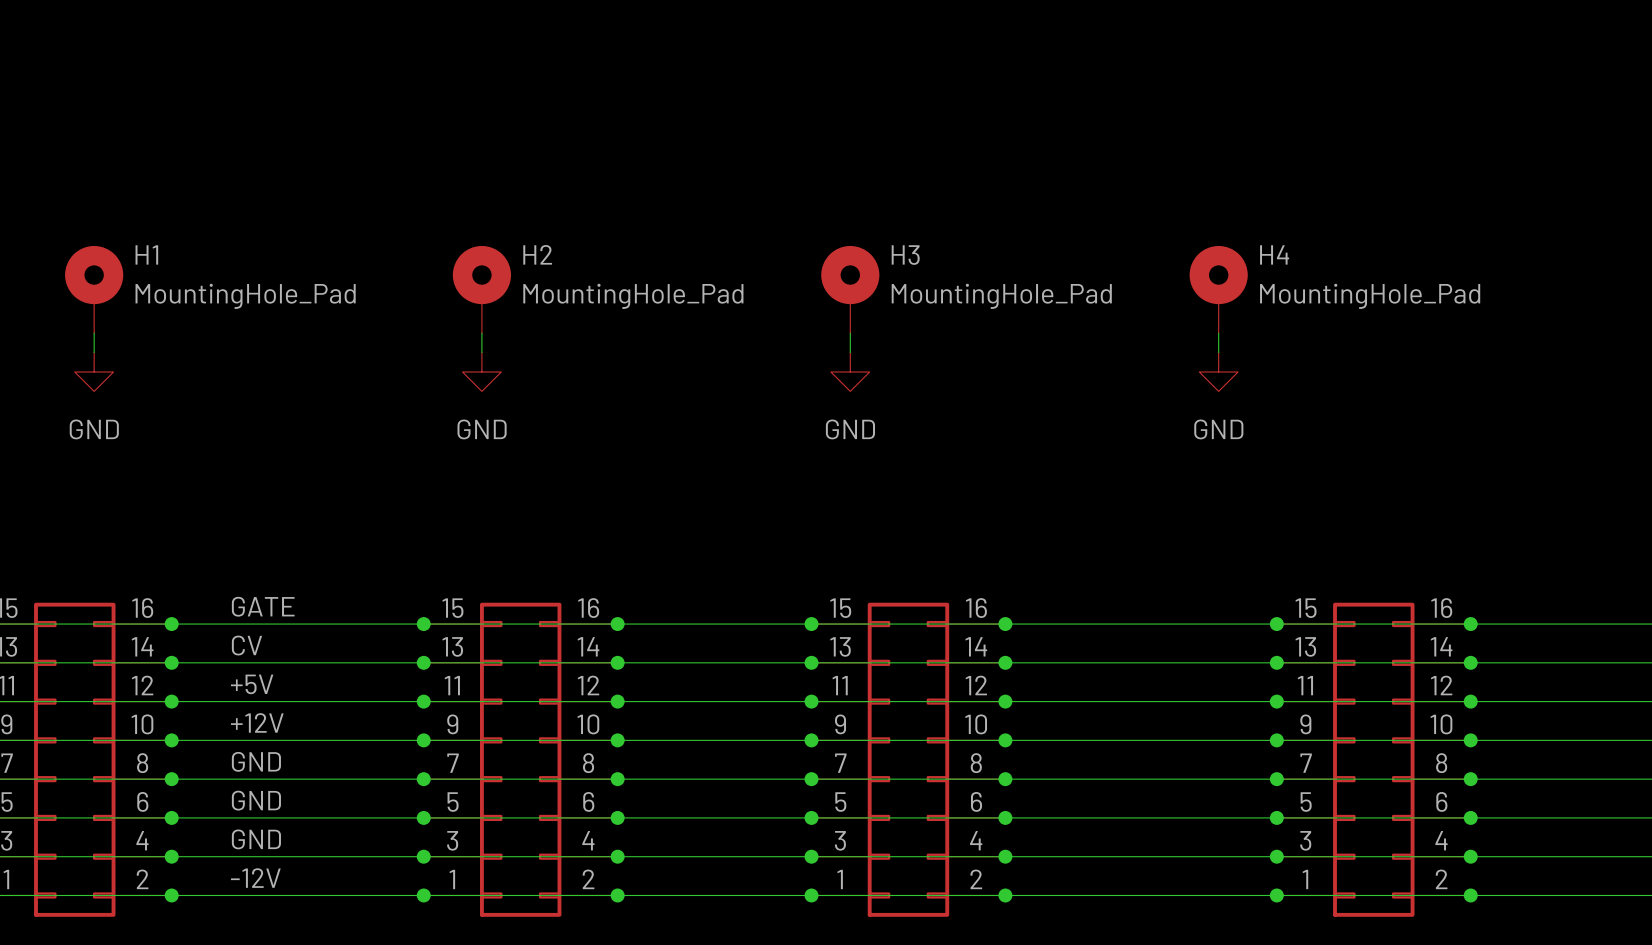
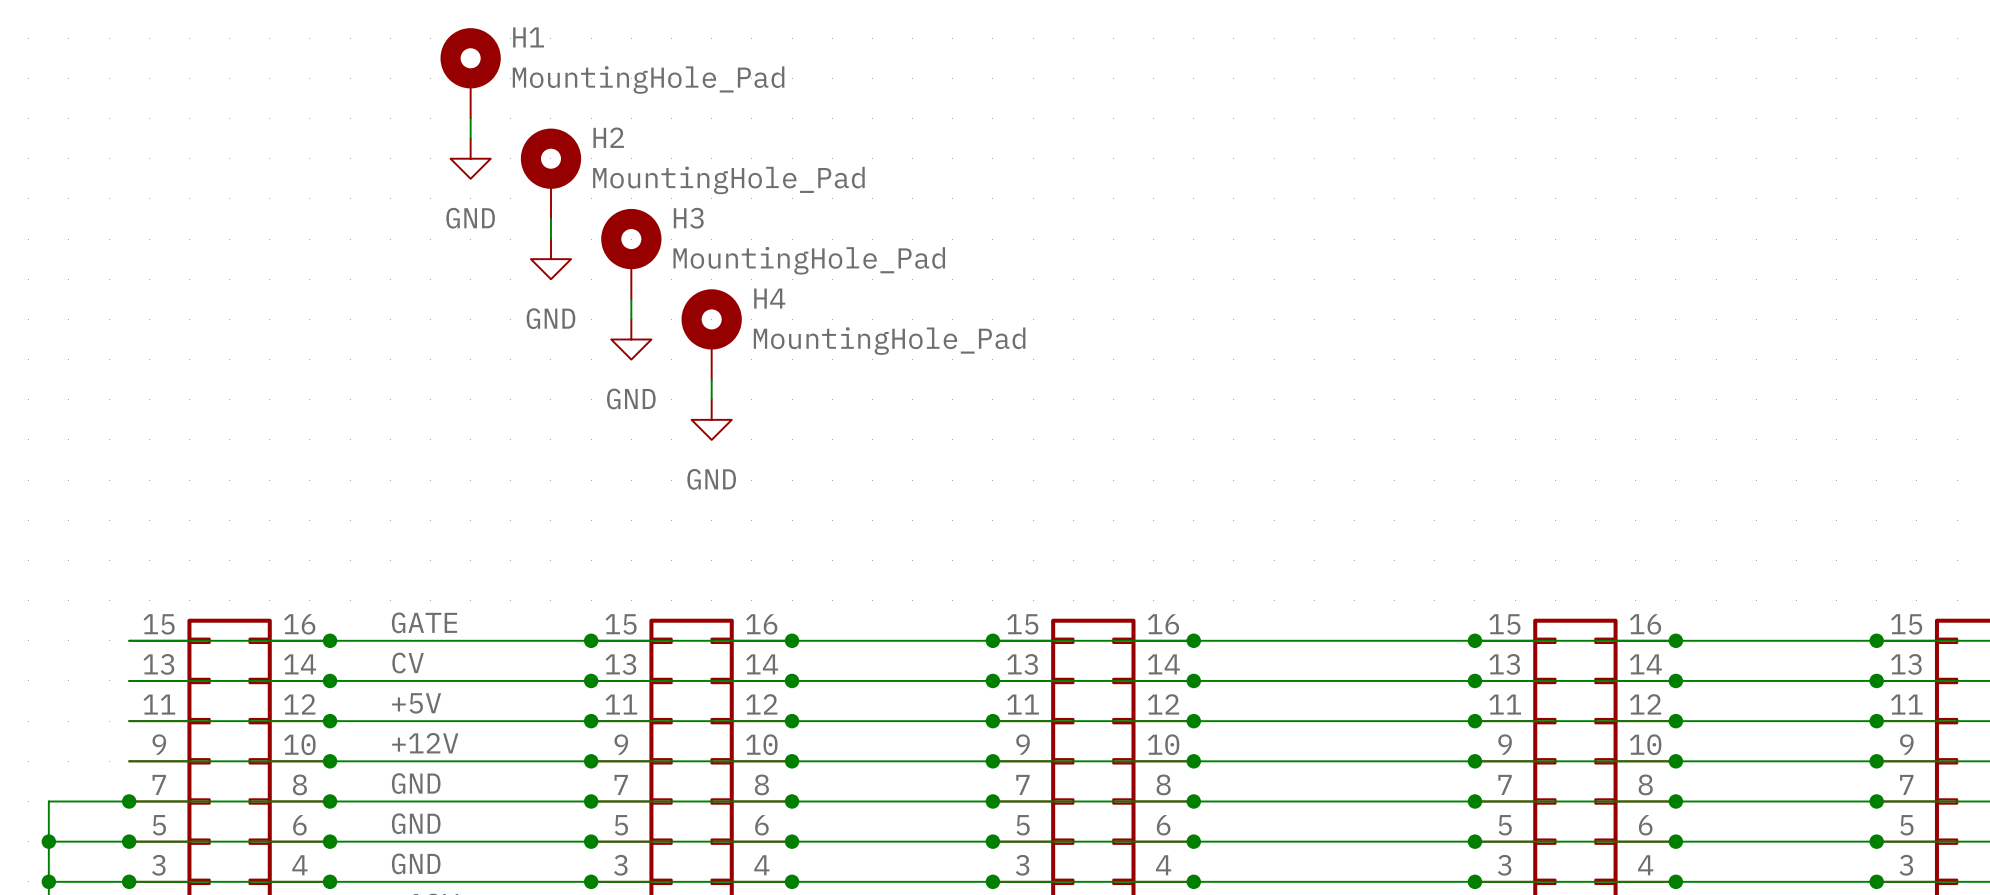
power symbol: none -> GND (470, 158)
wire: none -> (550, 218) (550, 239)
power symbol: none -> GND (550, 259)
H1 position: (94, 289) -> (470, 73)
H2 position: (481, 289) -> (550, 173)
H3 position: (850, 289) -> (631, 254)
H4 position: (1218, 289) -> (711, 334)
wire: (94, 333) (94, 352) -> (470, 118) (470, 138)
power symbol: none -> GND (631, 339)
wire: (481, 333) (481, 352) -> (631, 299) (631, 319)
wire: (850, 333) (850, 352) -> (711, 379) (711, 399)
wire: (1218, 333) (1218, 352) -> none
power symbol: GND (94, 371) -> none
power symbol: GND (481, 371) -> none
power symbol: GND (850, 371) -> none
power symbol: GND (1218, 371) -> none
power symbol: none -> GND (711, 419)

